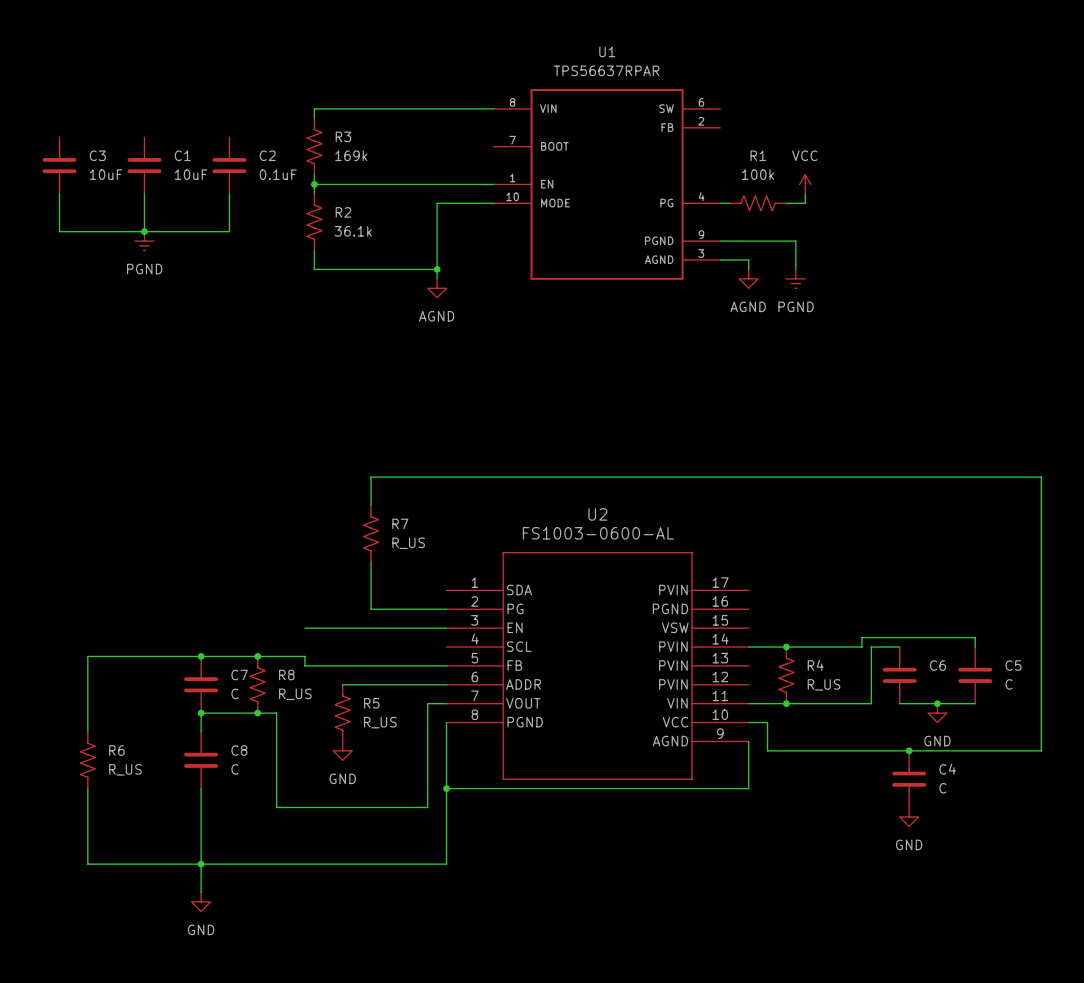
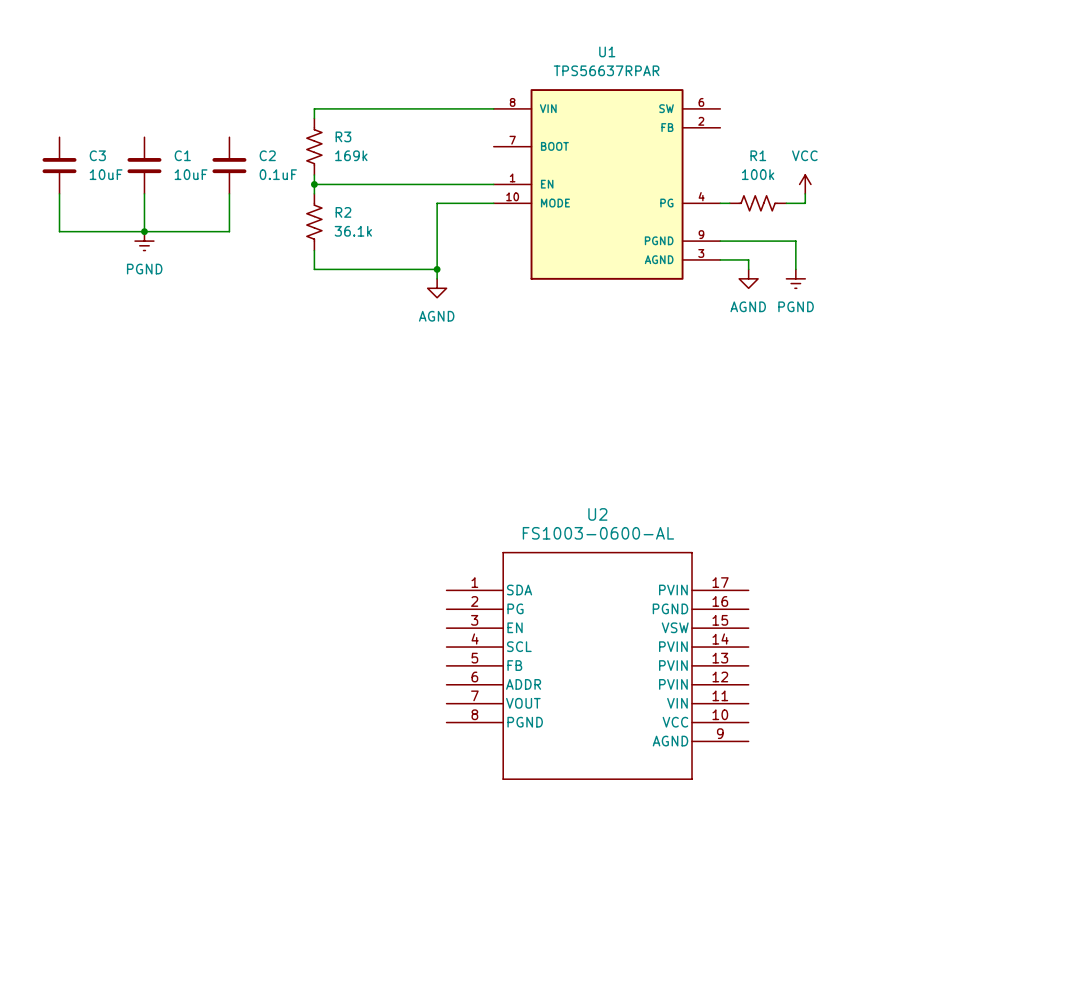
wire: (371, 505) (371, 477) (1041, 477) (1041, 750) (767, 750) (767, 722) (748, 722) -> none
R7: R_US (371, 533) -> none
wire: (371, 562) (371, 609) (446, 609) -> none
wire: (304, 628) (446, 628) -> none
wire: (748, 647) (861, 647) (861, 637) (975, 637) (975, 647) -> none
junction: (786, 647) -> none
wire: (899, 647) (871, 647) (871, 703) (748, 703) -> none
junction: (201, 656) -> none
junction: (257, 656) -> none
wire: (446, 665) (304, 665) (304, 656) (87, 656) (87, 731) -> none
R4: R_US (786, 675) -> none
C6: (899, 675) -> none
C5: C (975, 675) -> none
C7: C (201, 684) -> none
R8: R_US (257, 684) -> none
wire: (342, 684) (446, 684) -> none
wire: (446, 703) (427, 703) (427, 807) (276, 807) (276, 713) (201, 713) (201, 731) -> none
junction: (786, 703) -> none
wire: (899, 703) (975, 703) -> none
junction: (937, 703) -> none
junction: (201, 713) -> none
junction: (257, 713) -> none
R5: R_US (342, 713) -> none
power symbol: GND (937, 713) -> none
wire: (446, 722) (446, 864) (87, 864) (87, 788) -> none
wire: (748, 741) (748, 788) (446, 788) -> none
power symbol: GND (342, 750) -> none
junction: (909, 750) -> none
R6: R_US (87, 760) -> none
C8: C (201, 760) -> none
C4: C (909, 779) -> none
wire: (201, 788) (201, 892) -> none
junction: (446, 788) -> none
power symbol: GND (909, 816) -> none
junction: (201, 864) -> none
power symbol: GND (201, 901) -> none

